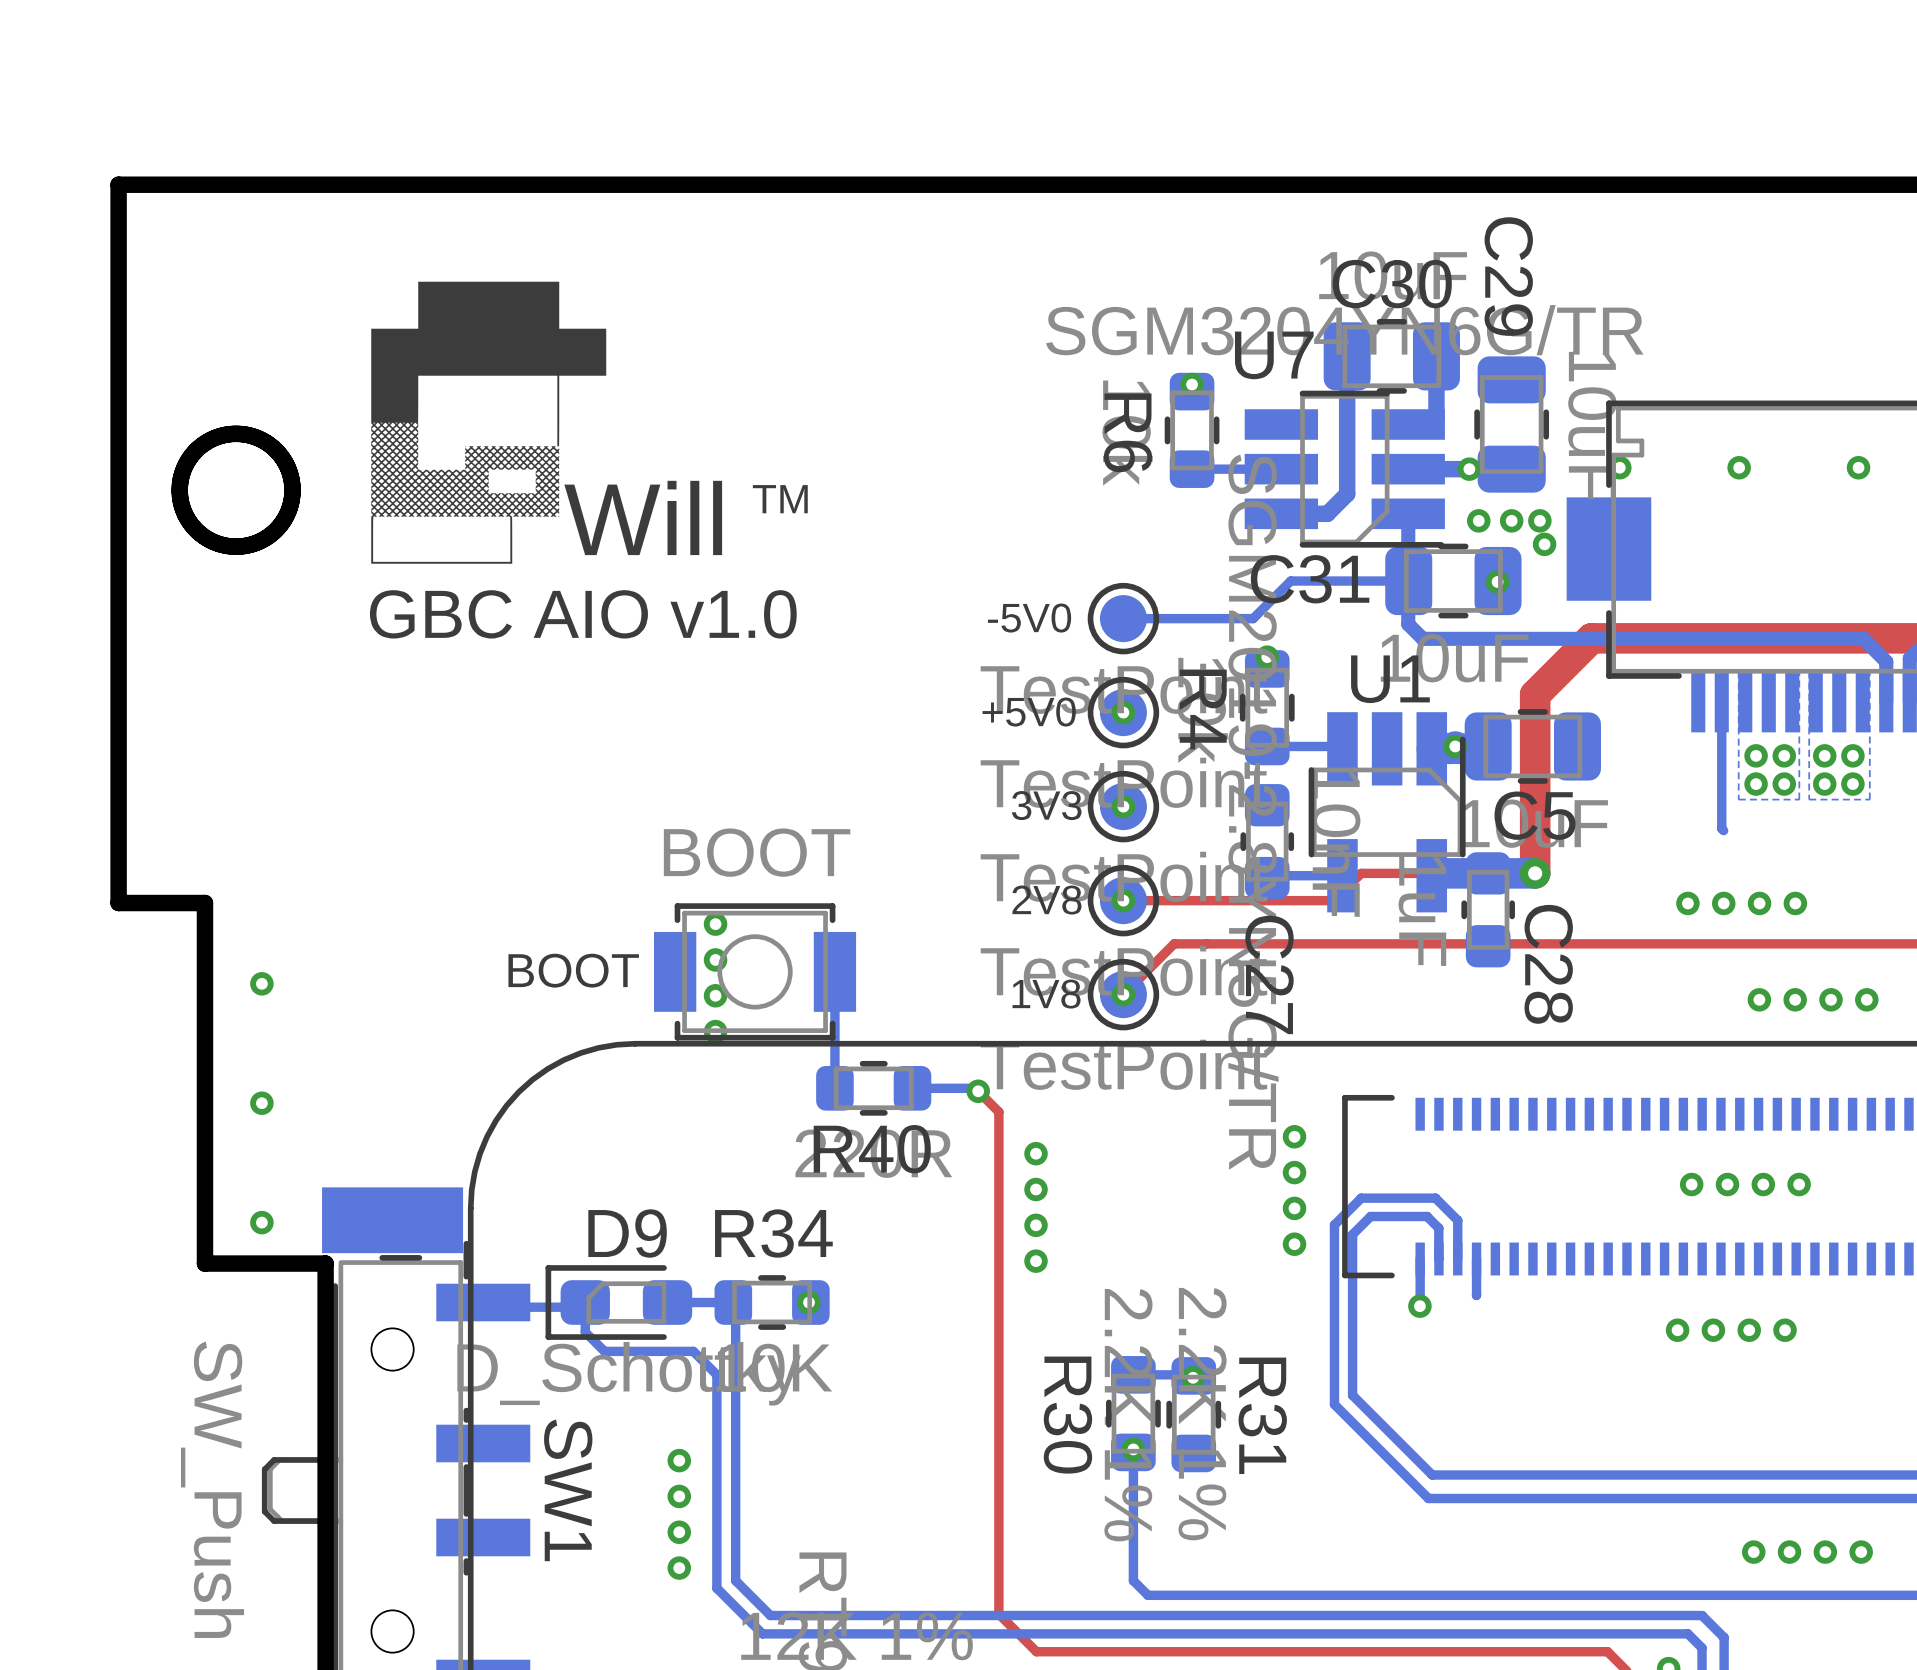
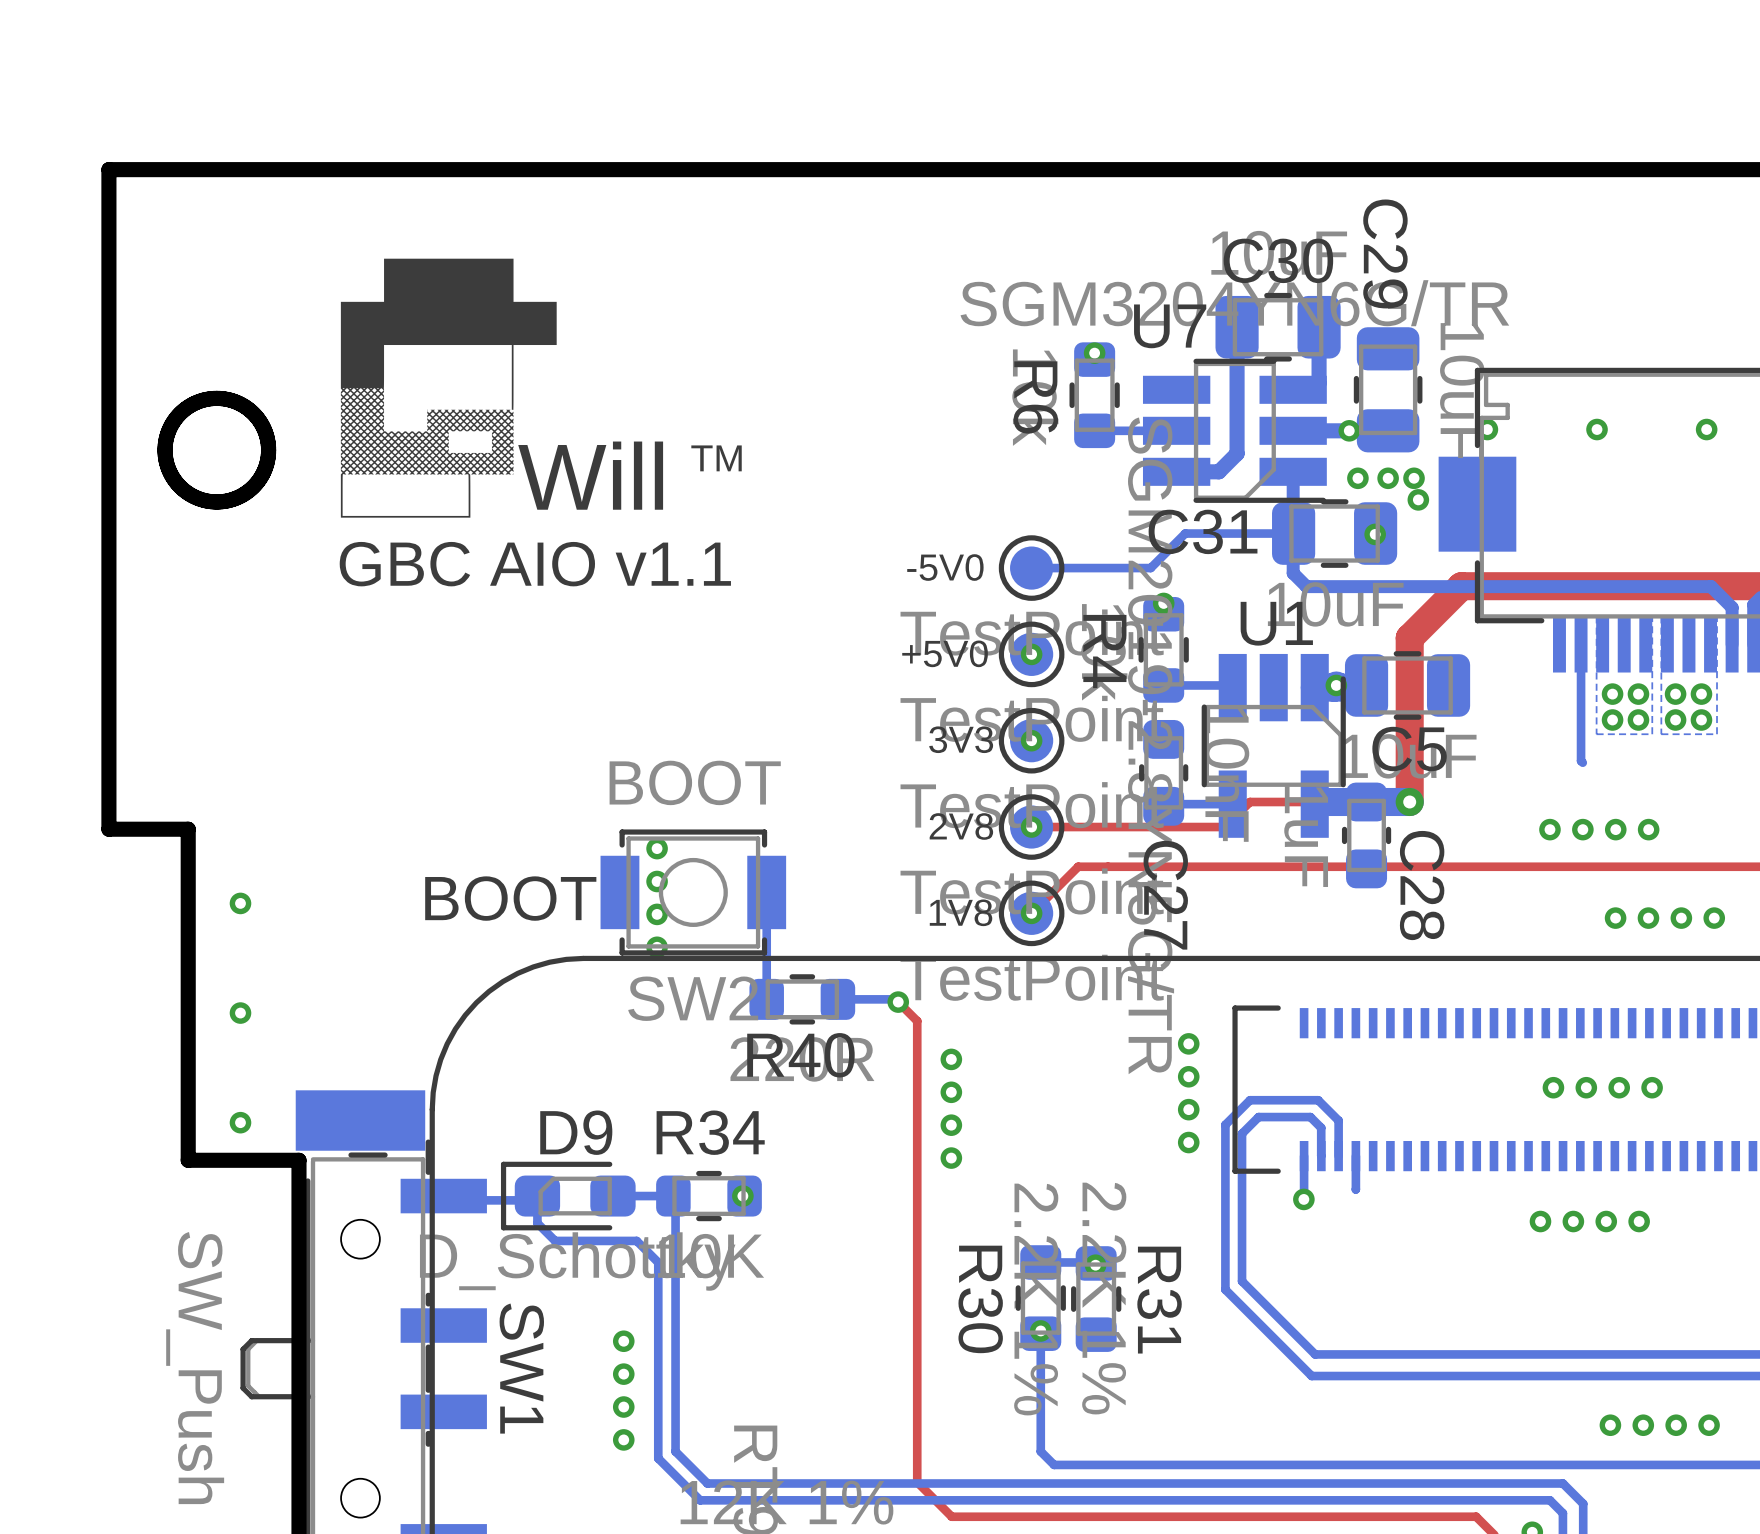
text: GBC AIO v1.0 (583, 614) -> GBC AIO v1.1 (535, 564)
BOOT name: BOOT (573, 970) -> SW2 (693, 998)
text: none -> BOOT (510, 898)

